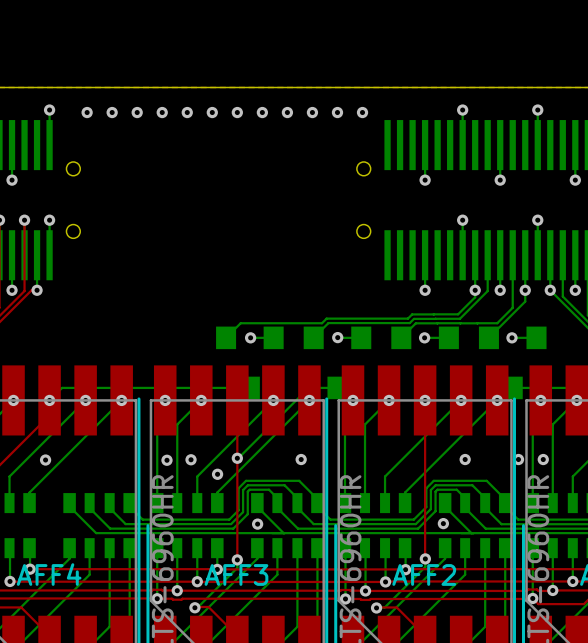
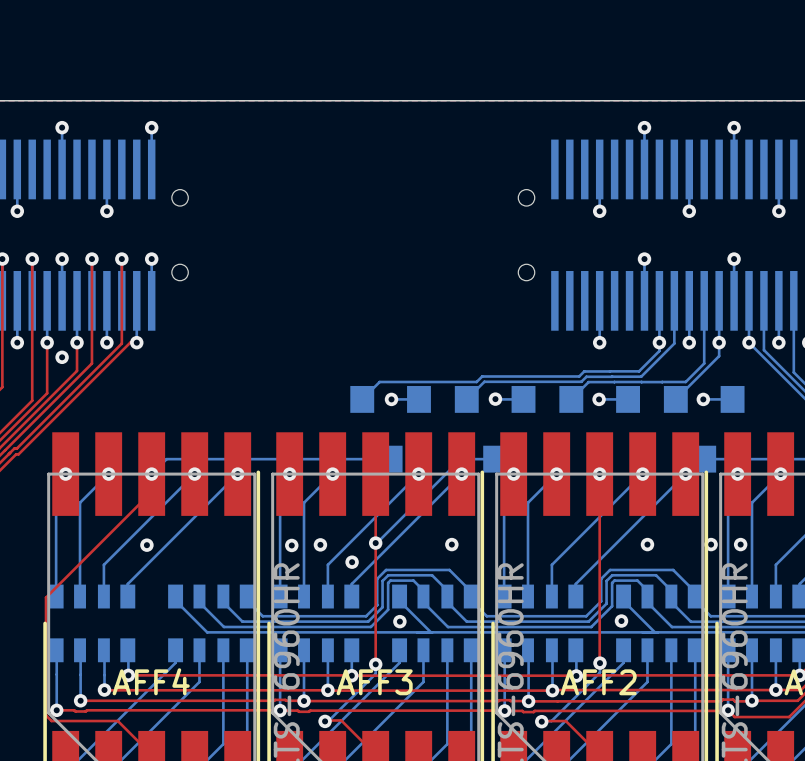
via: (87, 112) -> none
via: (112, 112) -> none
via: (137, 112) -> none
via: (162, 112) -> none
via: (187, 112) -> none
via: (212, 112) -> none
via: (237, 112) -> none
via: (262, 112) -> none
via: (287, 112) -> none
via: (312, 112) -> none
via: (337, 112) -> none
via: (362, 112) -> none

